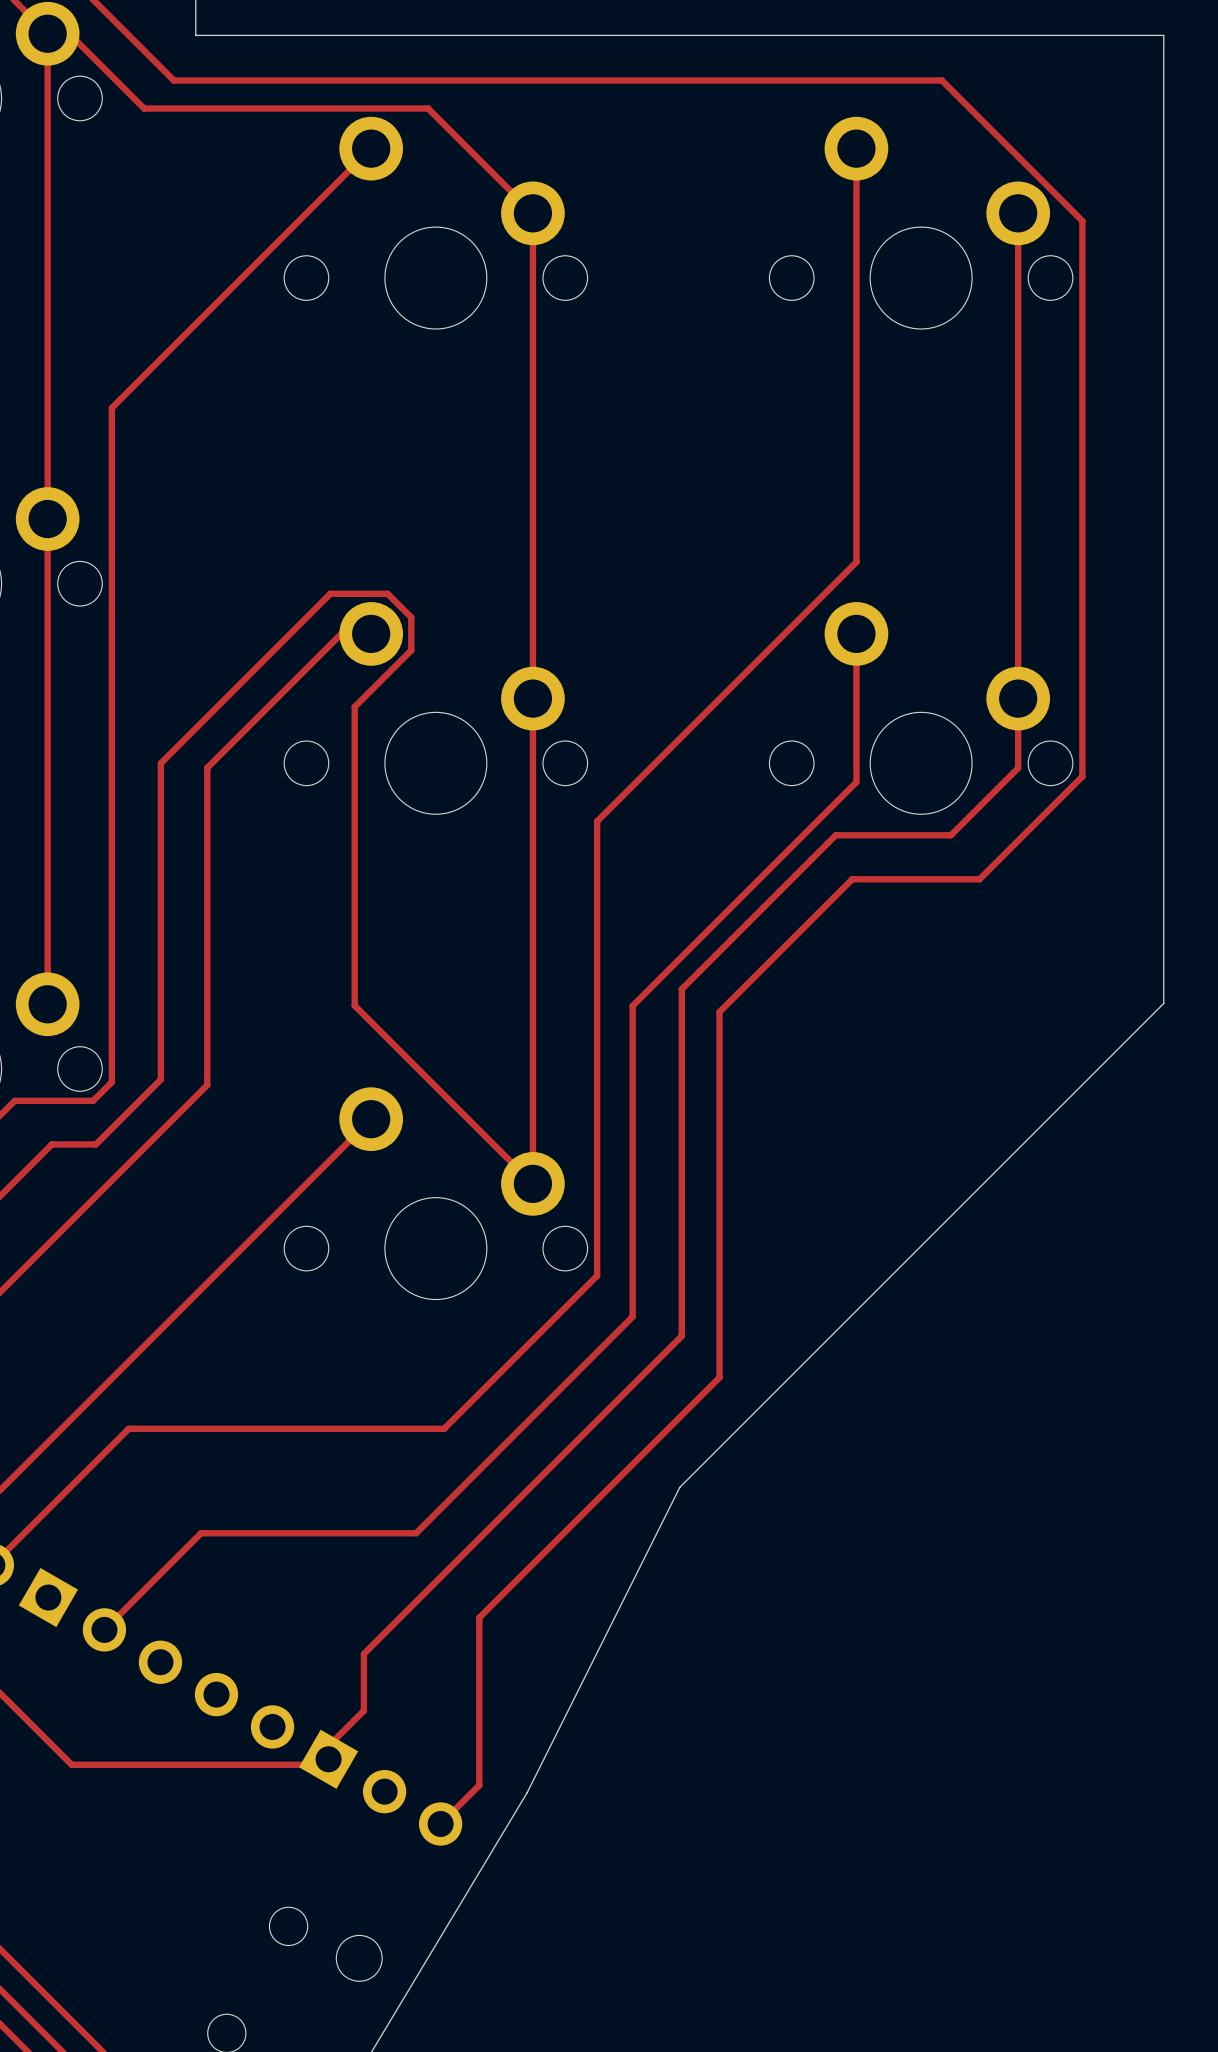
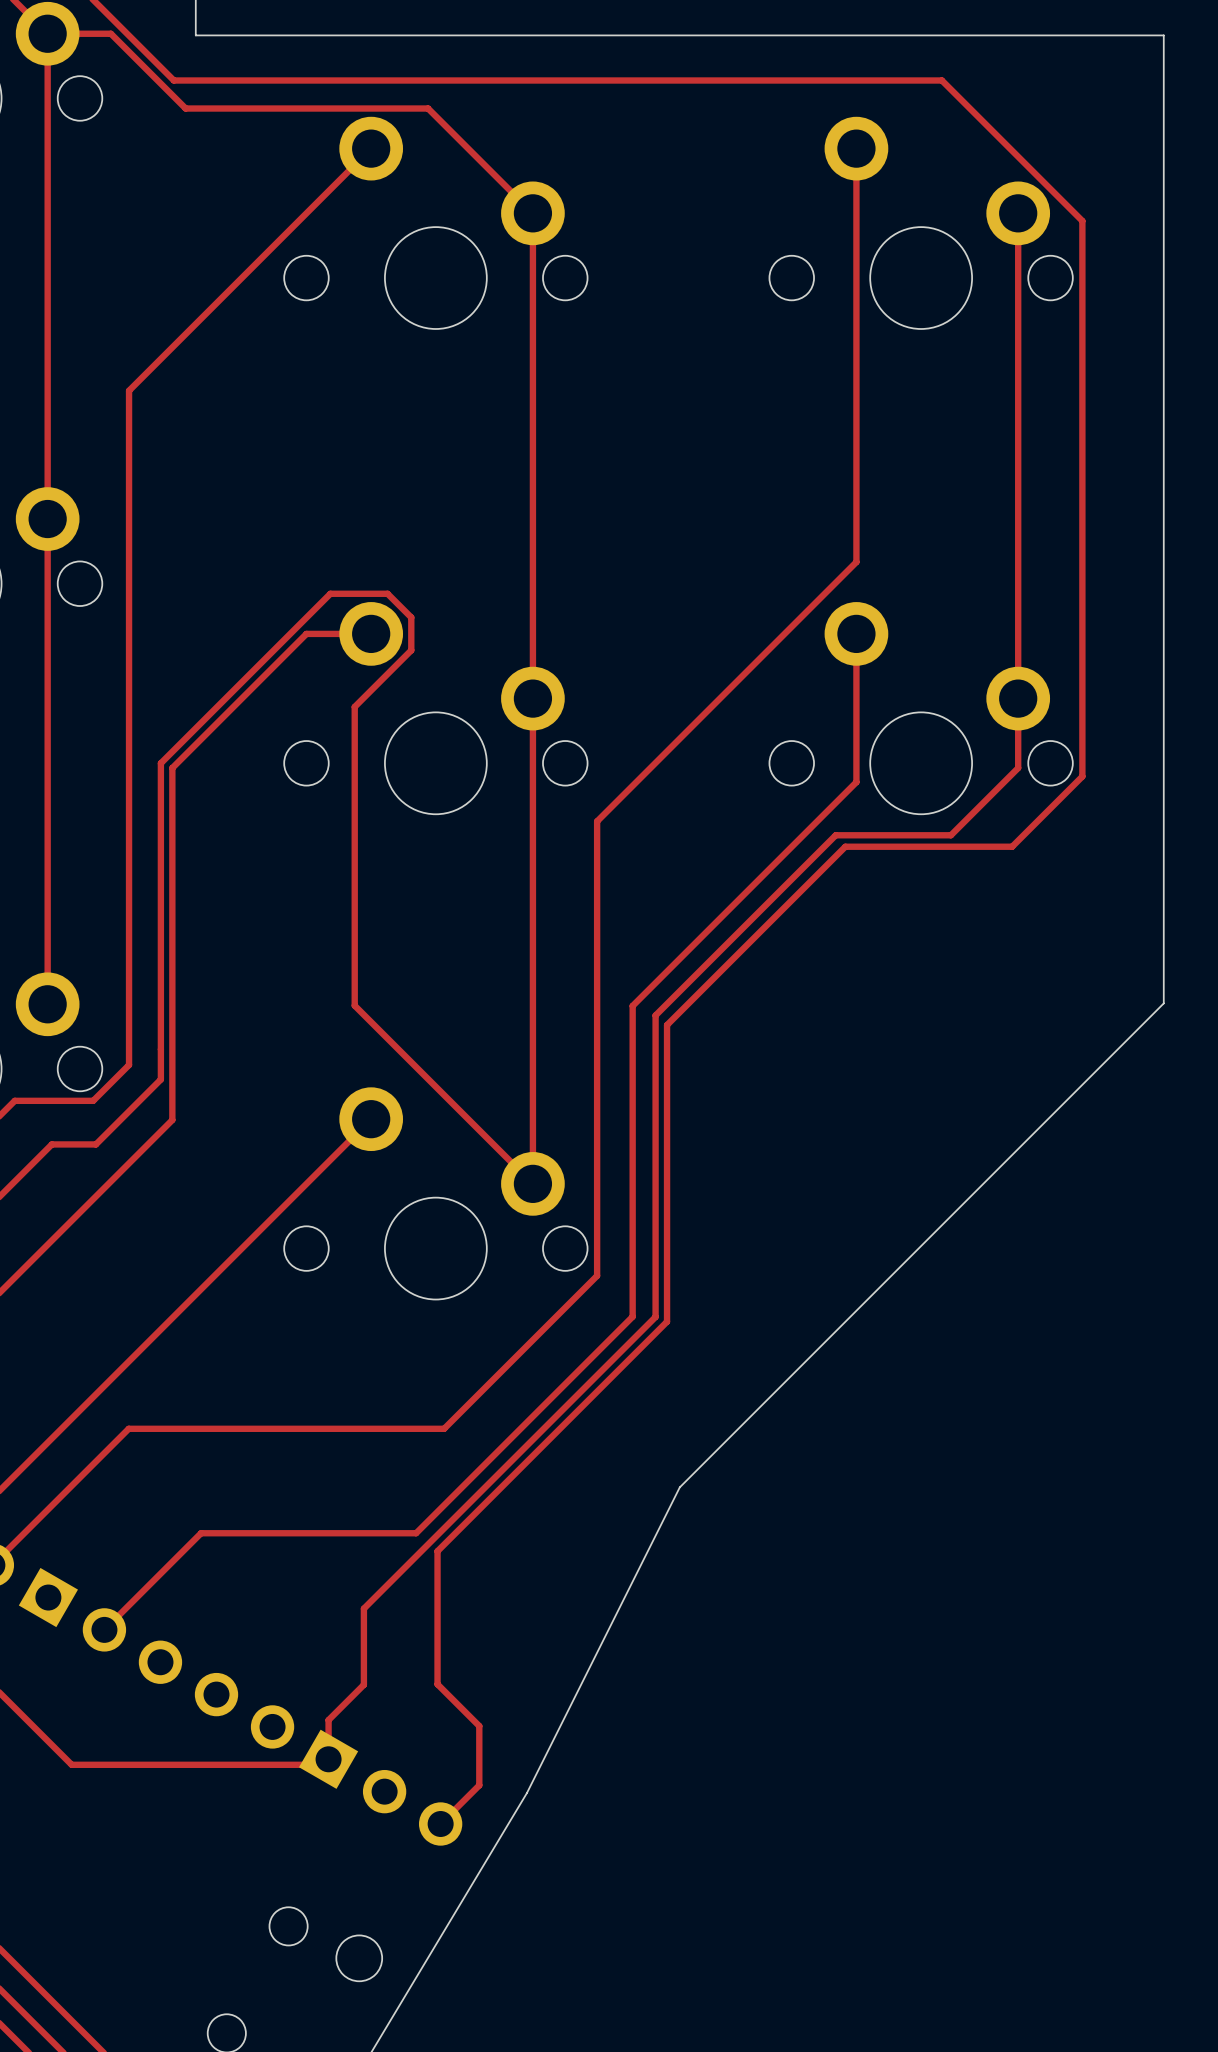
track: (69, 33) (144, 108) (185, 108) -> (69, 33) (110, 33) (185, 108)
track: (129, 390) (111, 407) (111, 1082) -> (129, 390) (129, 1064) (111, 1082)
track: (341, 633) (207, 767) (207, 1085) (172, 1120) -> (341, 633) (306, 633) (172, 768) (172, 1120)
track: (1012, 846) (979, 879) (852, 879) (719, 1011) (719, 1377) (479, 1617) (479, 1726) -> (1012, 846) (845, 846) (667, 1025) (667, 1321) (437, 1551) (437, 1684) (479, 1726)
track: (681, 989) (681, 1336) (363, 1653) -> (681, 989) (655, 1015) (655, 1316) (363, 1608) (363, 1653)
track: (363, 1684) (363, 1710) (328, 1746) -> (363, 1684) (328, 1720) (328, 1746)

